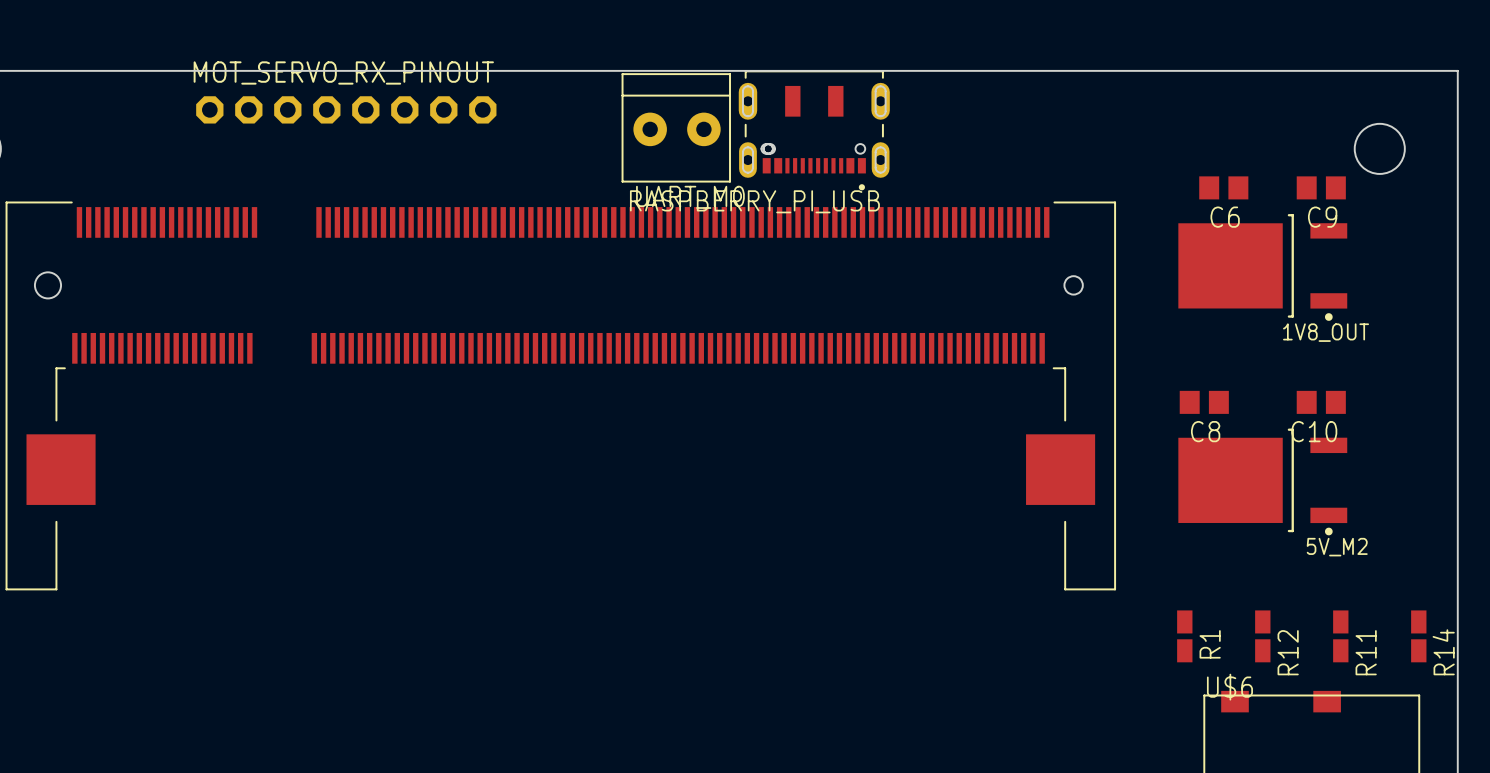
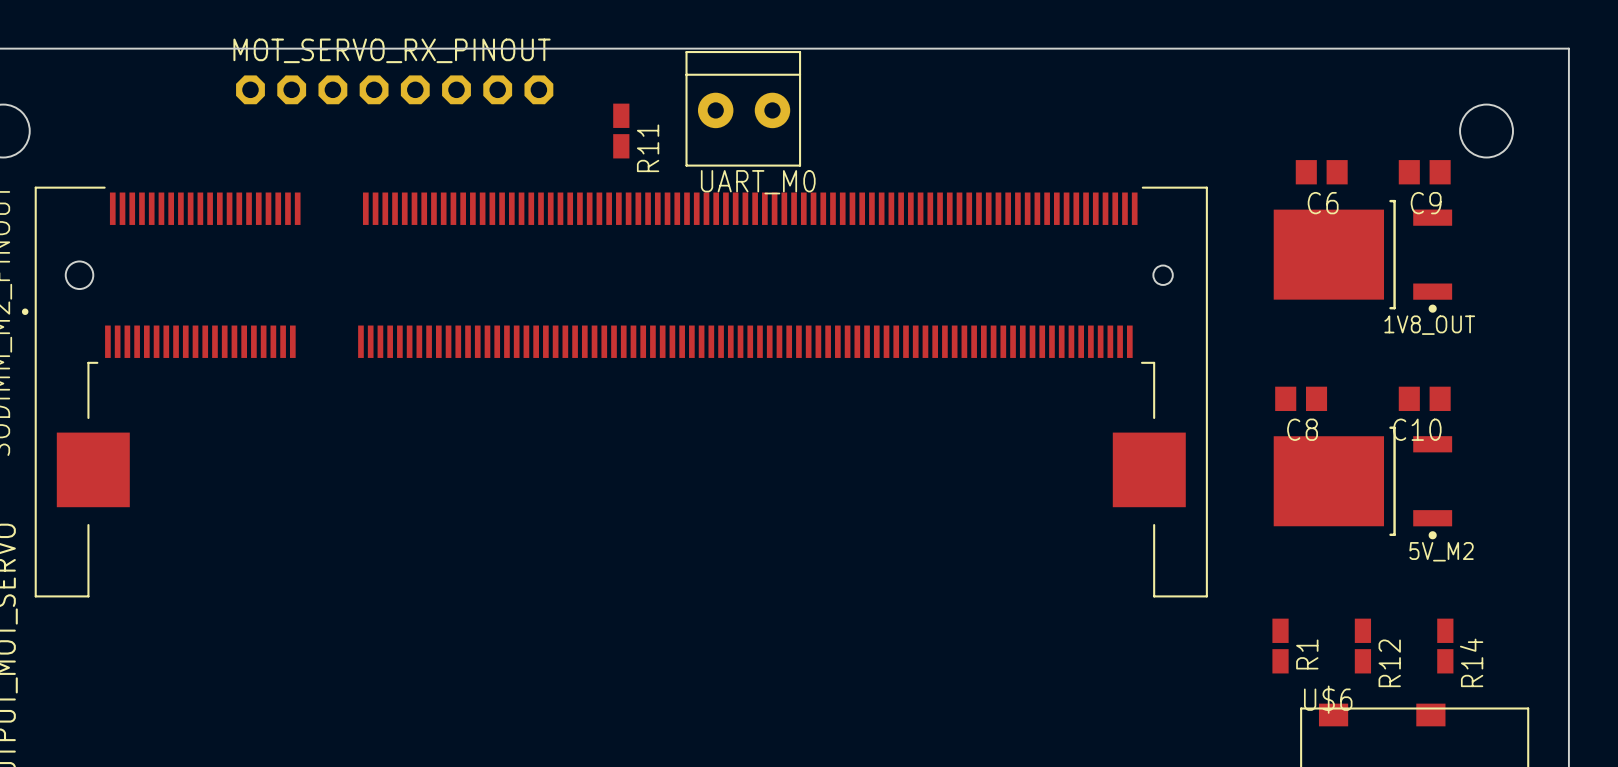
RASPBERRY_PI_USB: (814, 130) -> none
R11: none -> (621, 131)
R14: (1418, 636) -> none
R11 name: R11 (1366, 652) -> R14 (1471, 662)

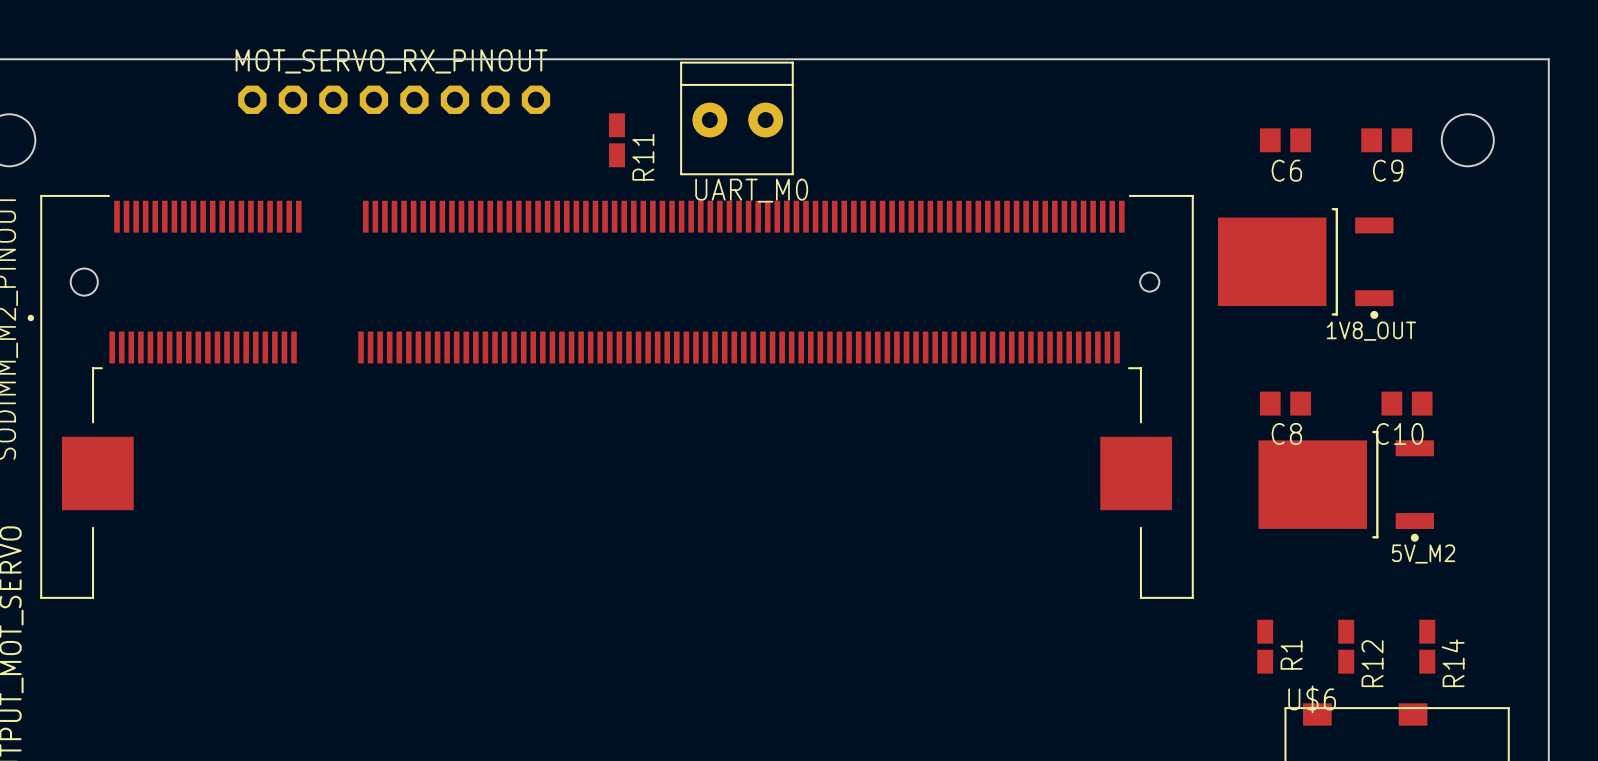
C6 position: (1321, 172) -> (1285, 140)
C9 position: (1424, 172) -> (1386, 140)
1V8_OUT position: (1362, 256) -> (1305, 263)

